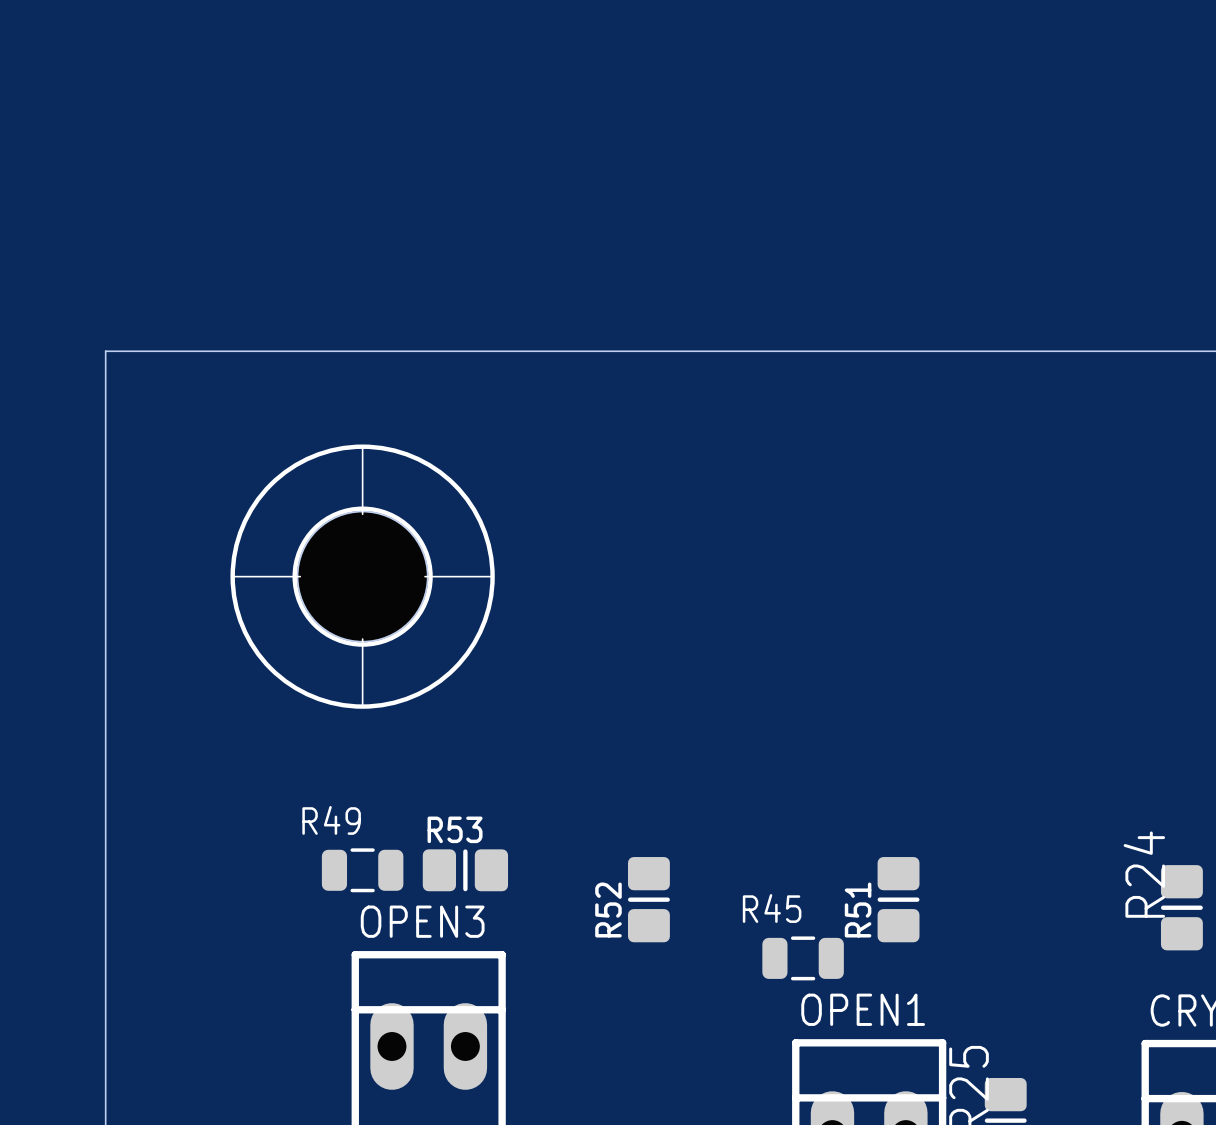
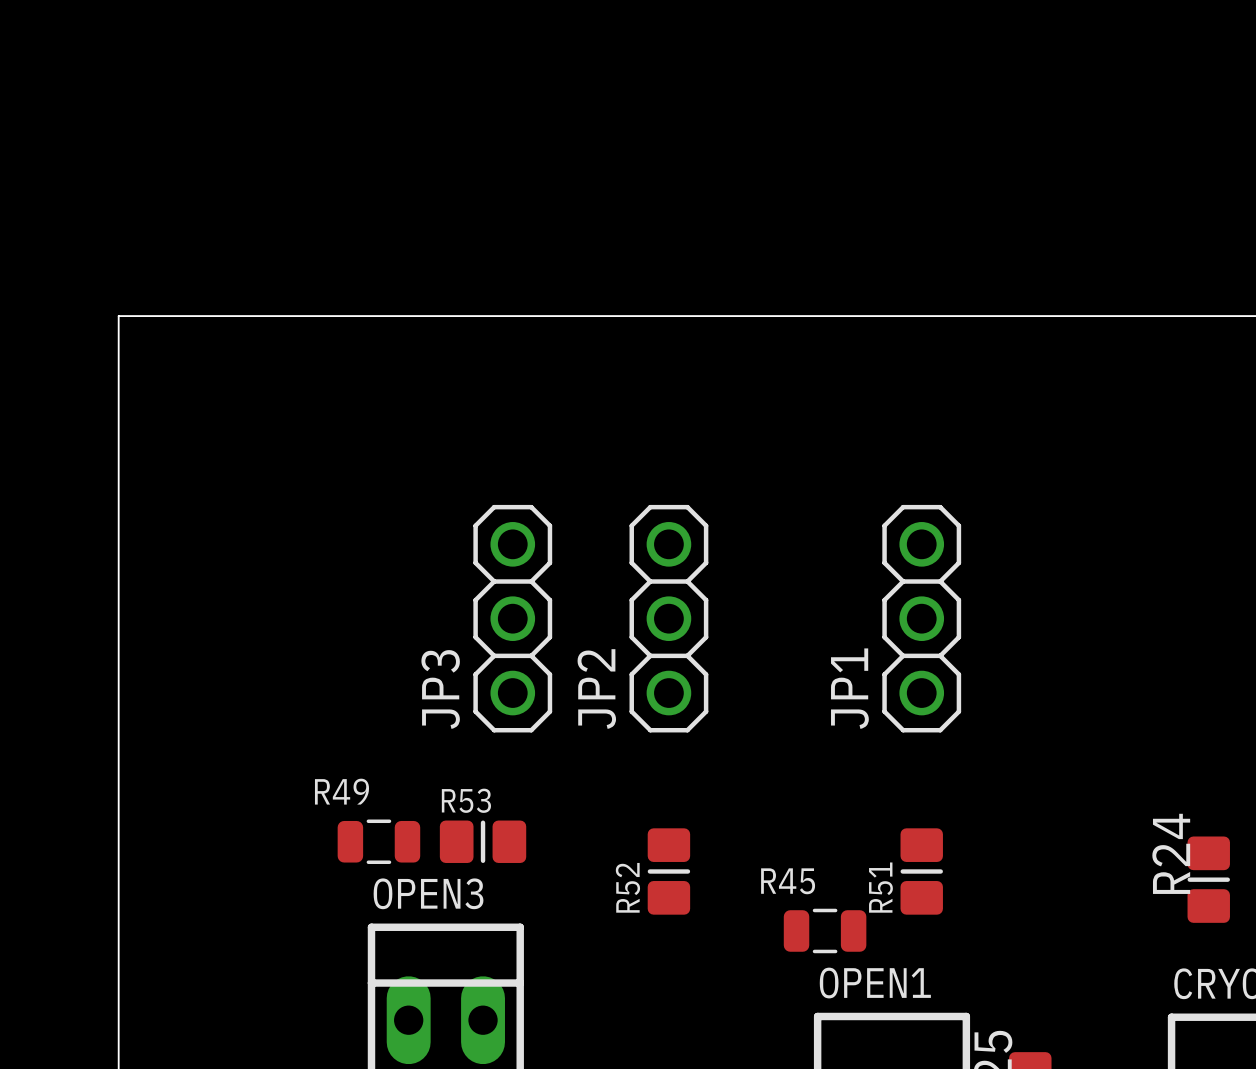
part: (362, 576) -> none
JP3: none -> (512, 618)
JP2: none -> (668, 618)
JP1: none -> (921, 618)

